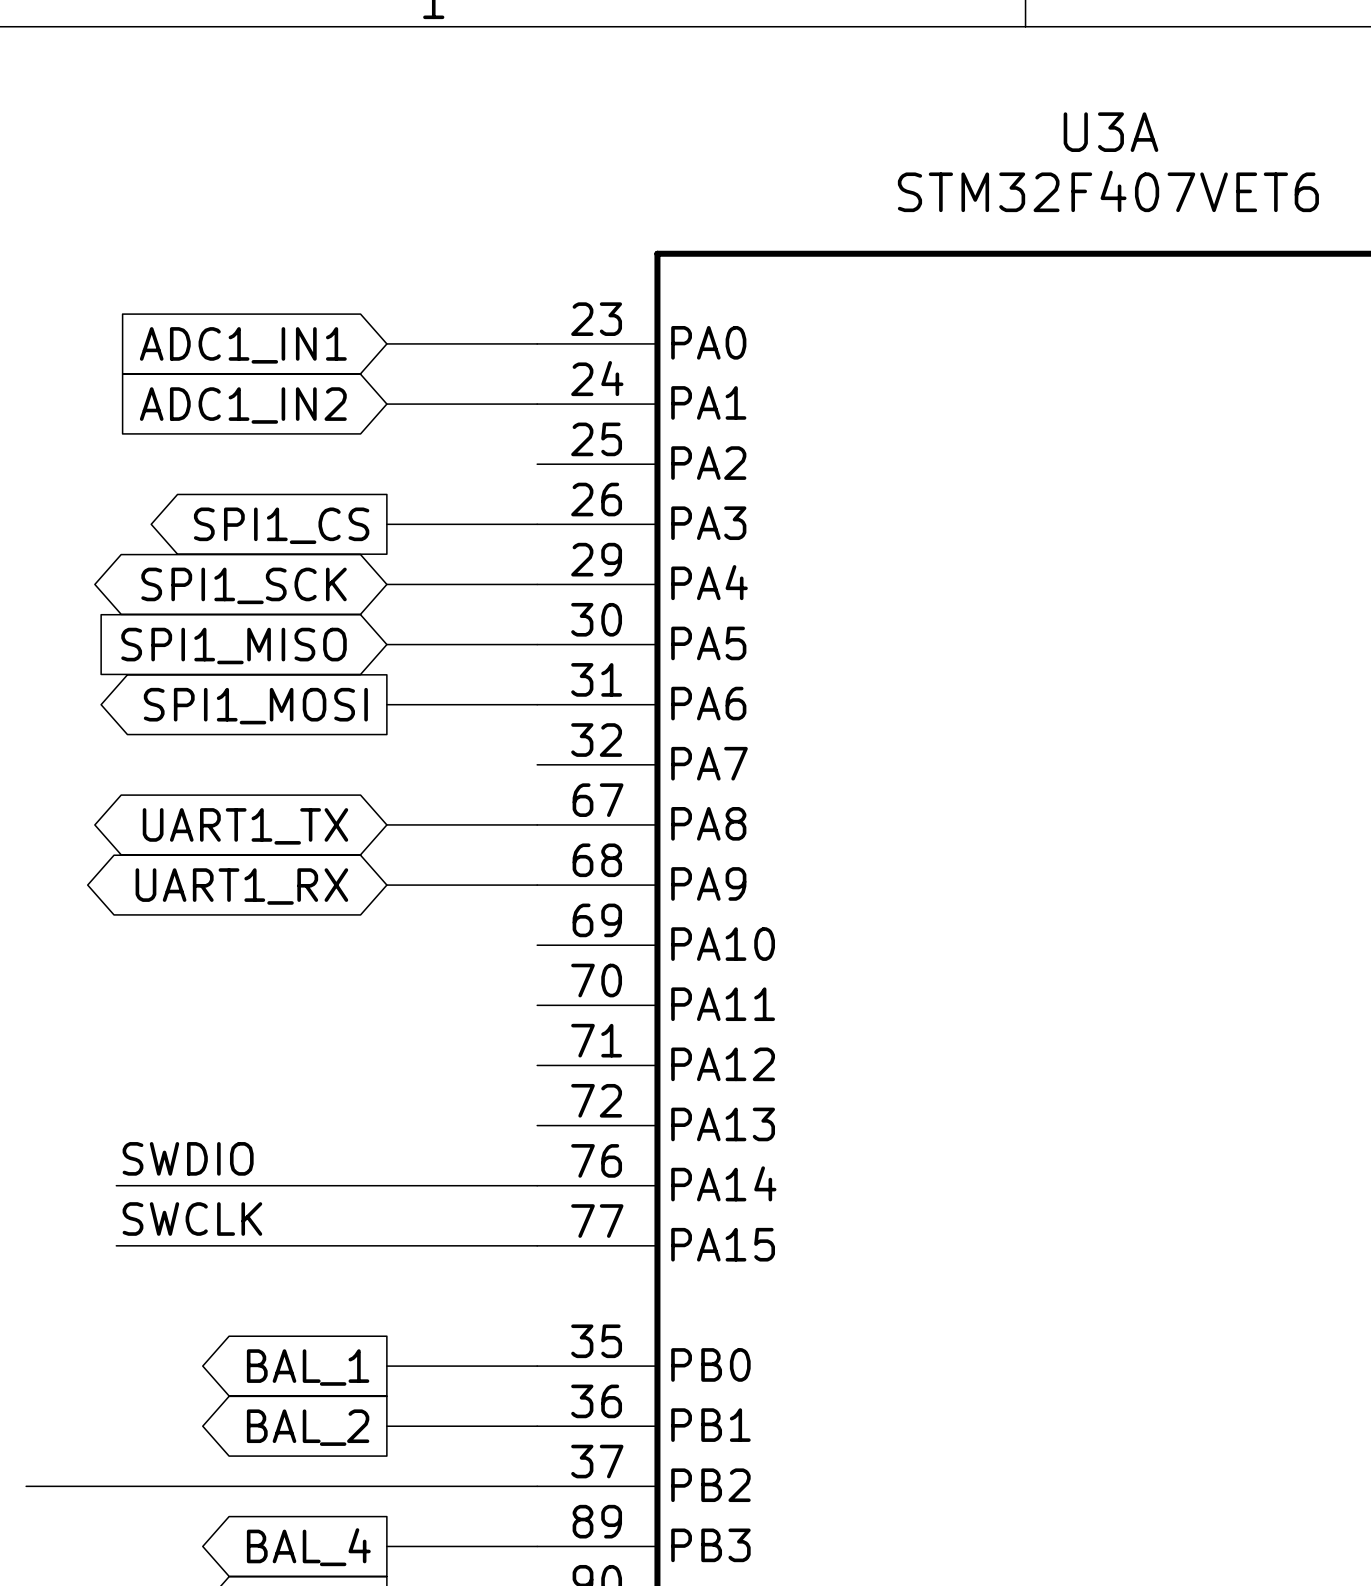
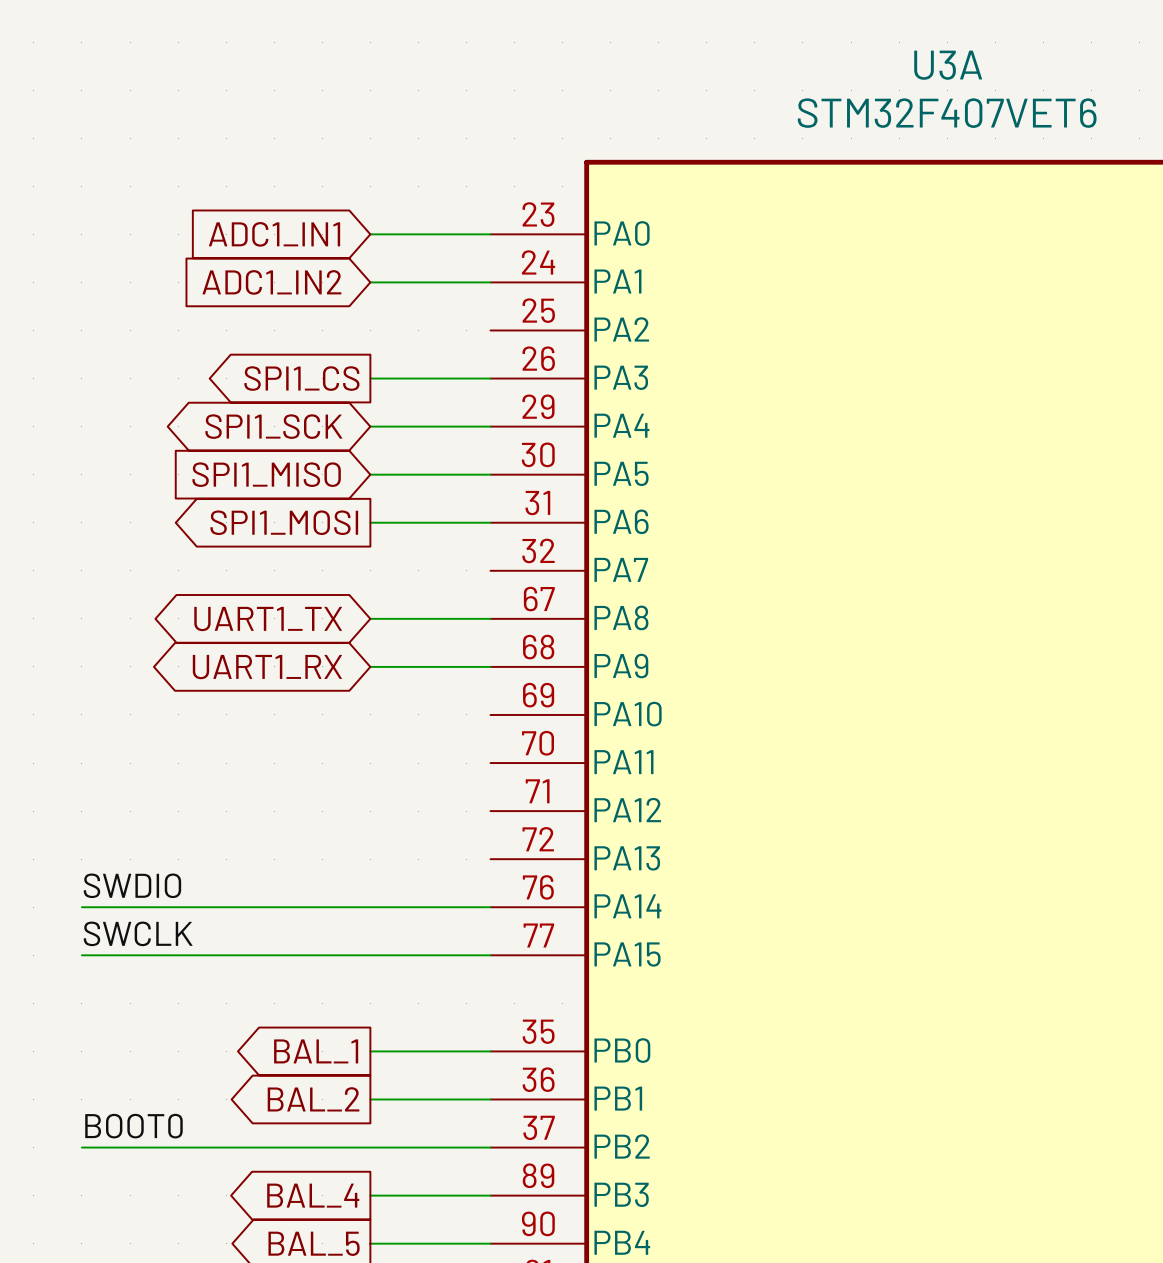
label position: SWDIO (188, 1158) -> SWDIO (132, 885)
wire: none -> (81, 907) (154, 907)
label position: SWCLK (192, 1219) -> SWCLK (138, 933)
wire: none -> (81, 955) (154, 955)
label: none -> BOOT0 (133, 1126)

